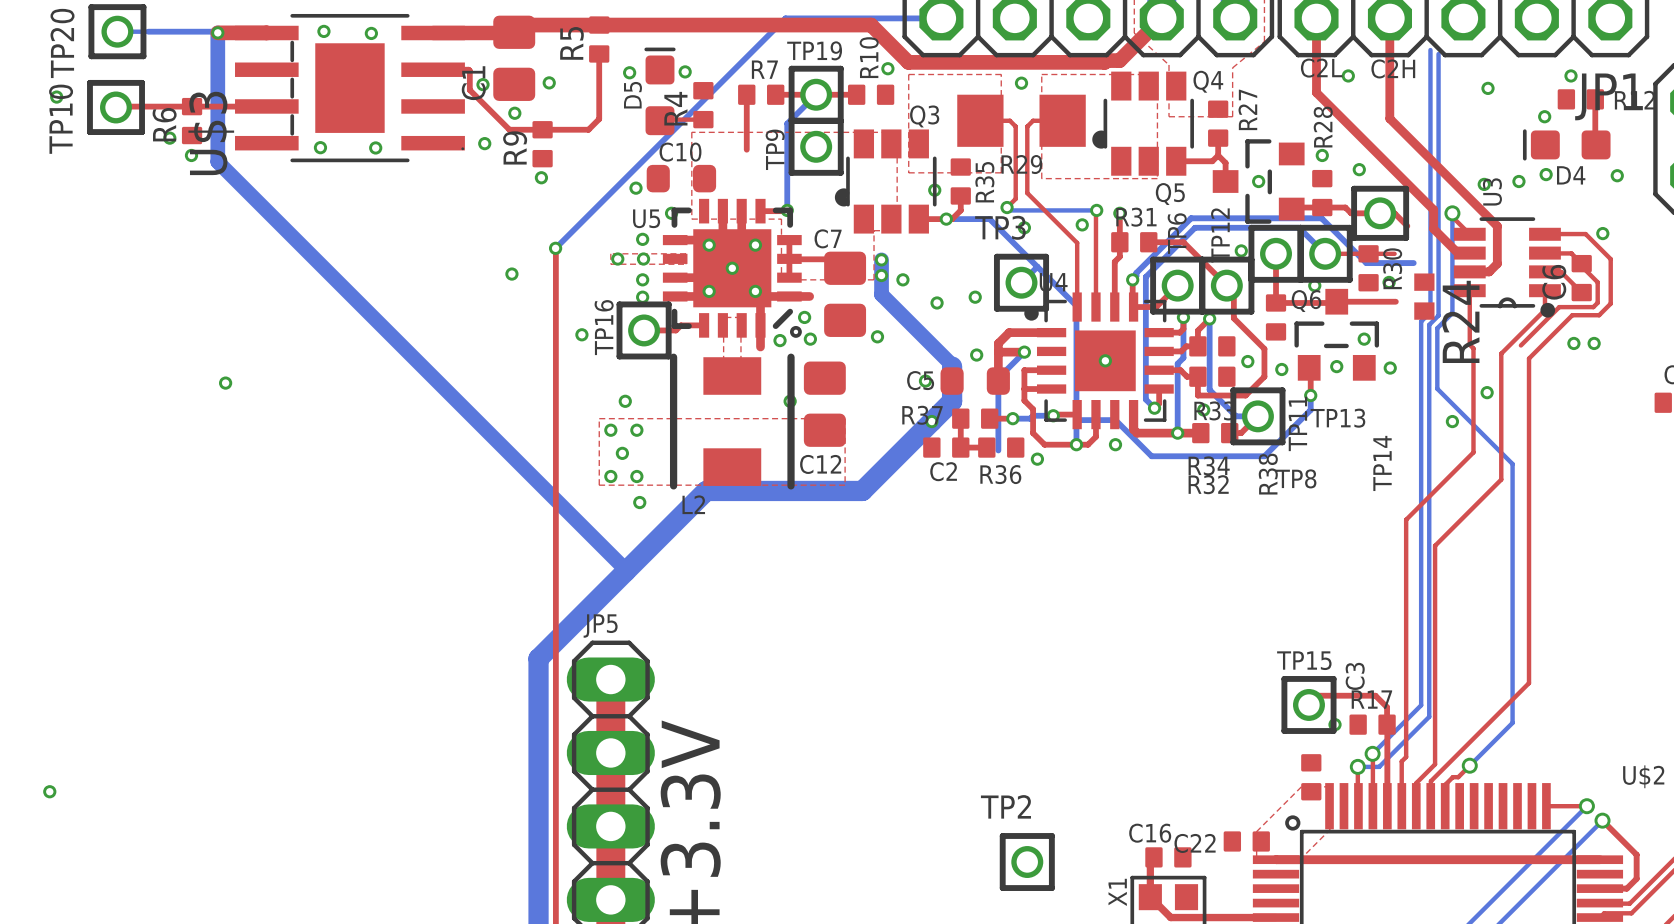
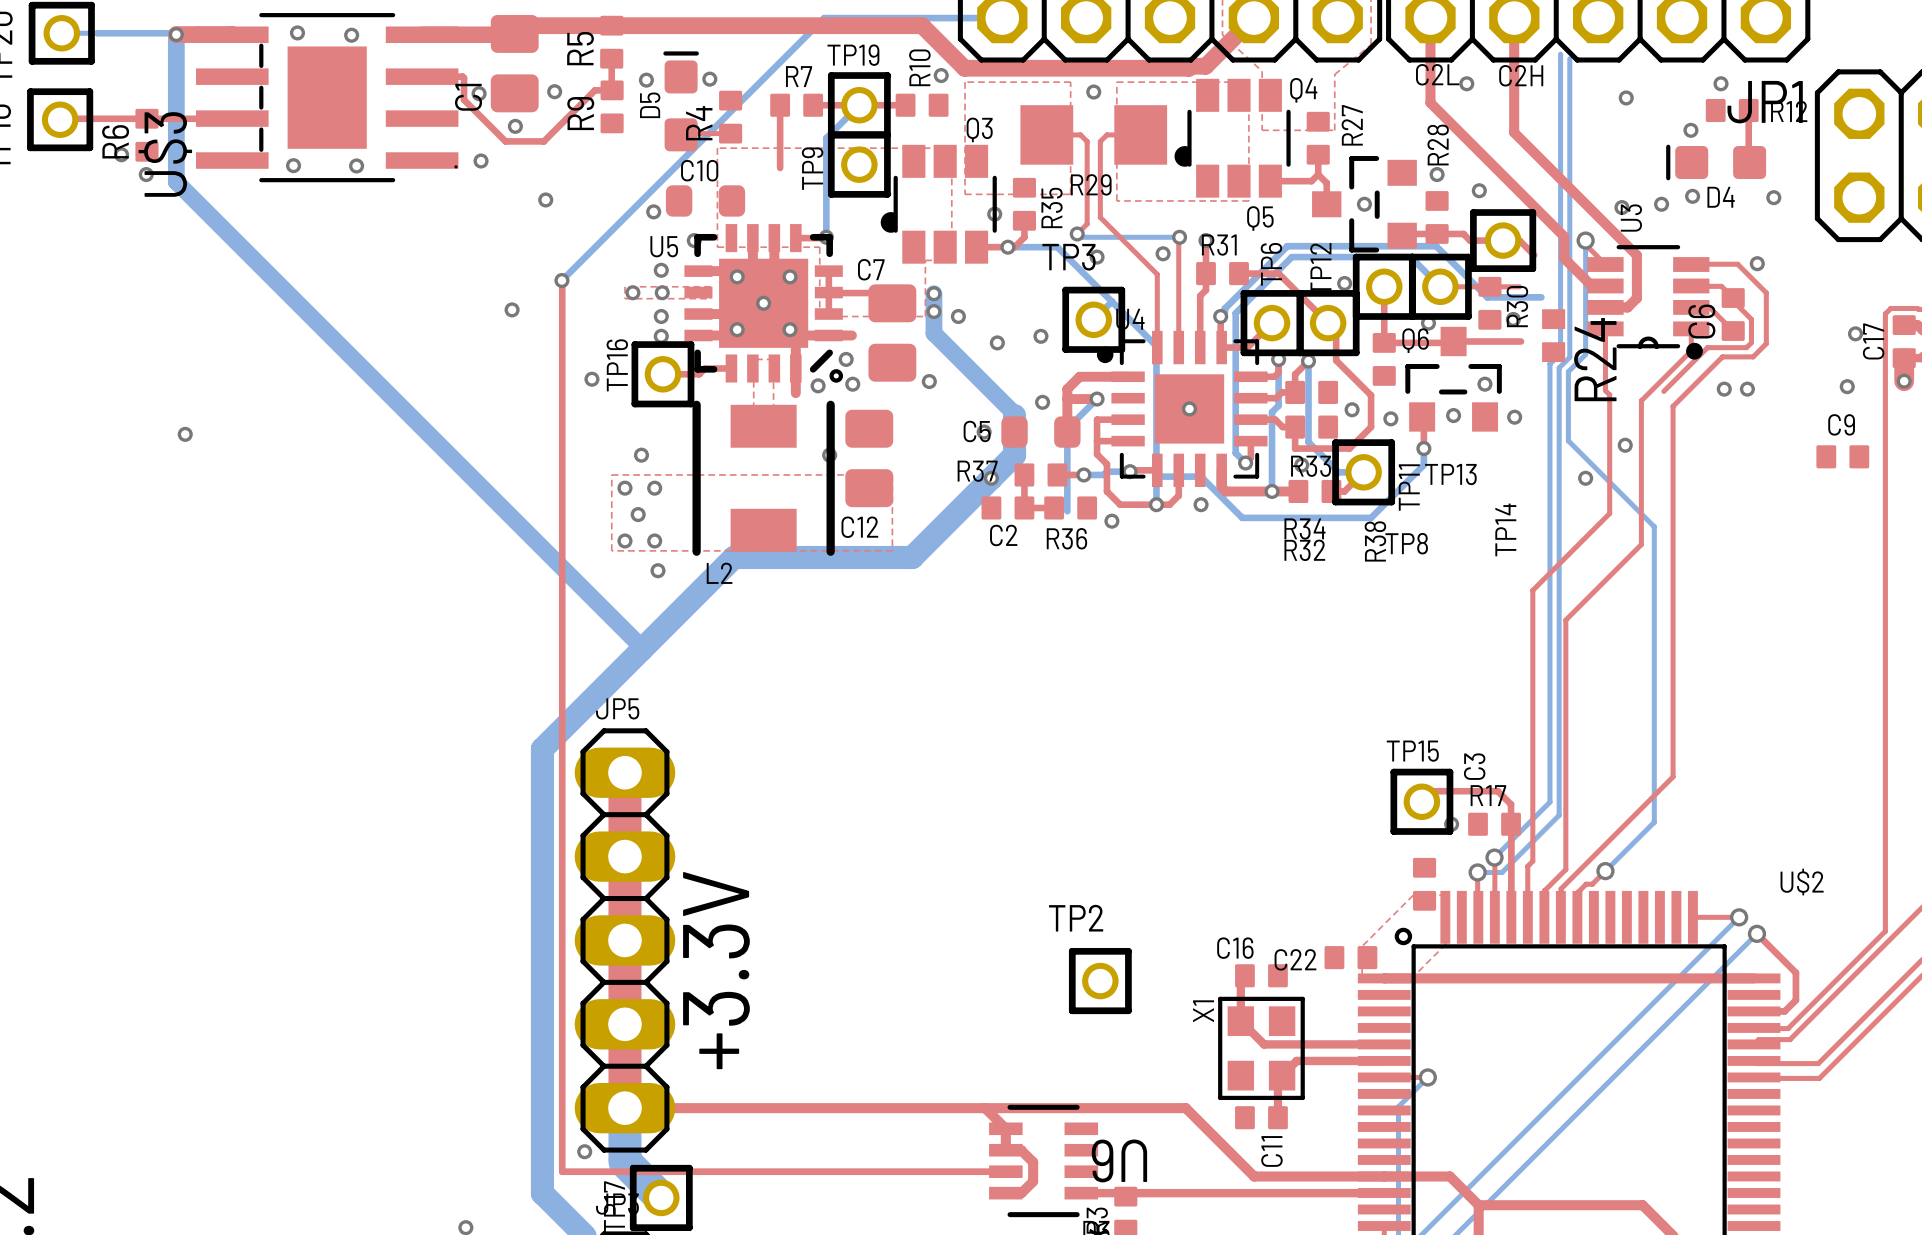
top track: (599, 81) (599, 119) (588, 129) (509, 129) (506, 126) -> (612, 90) (594, 90) (543, 141) (505, 141)
R9 position: (542, 144) -> (612, 106)

